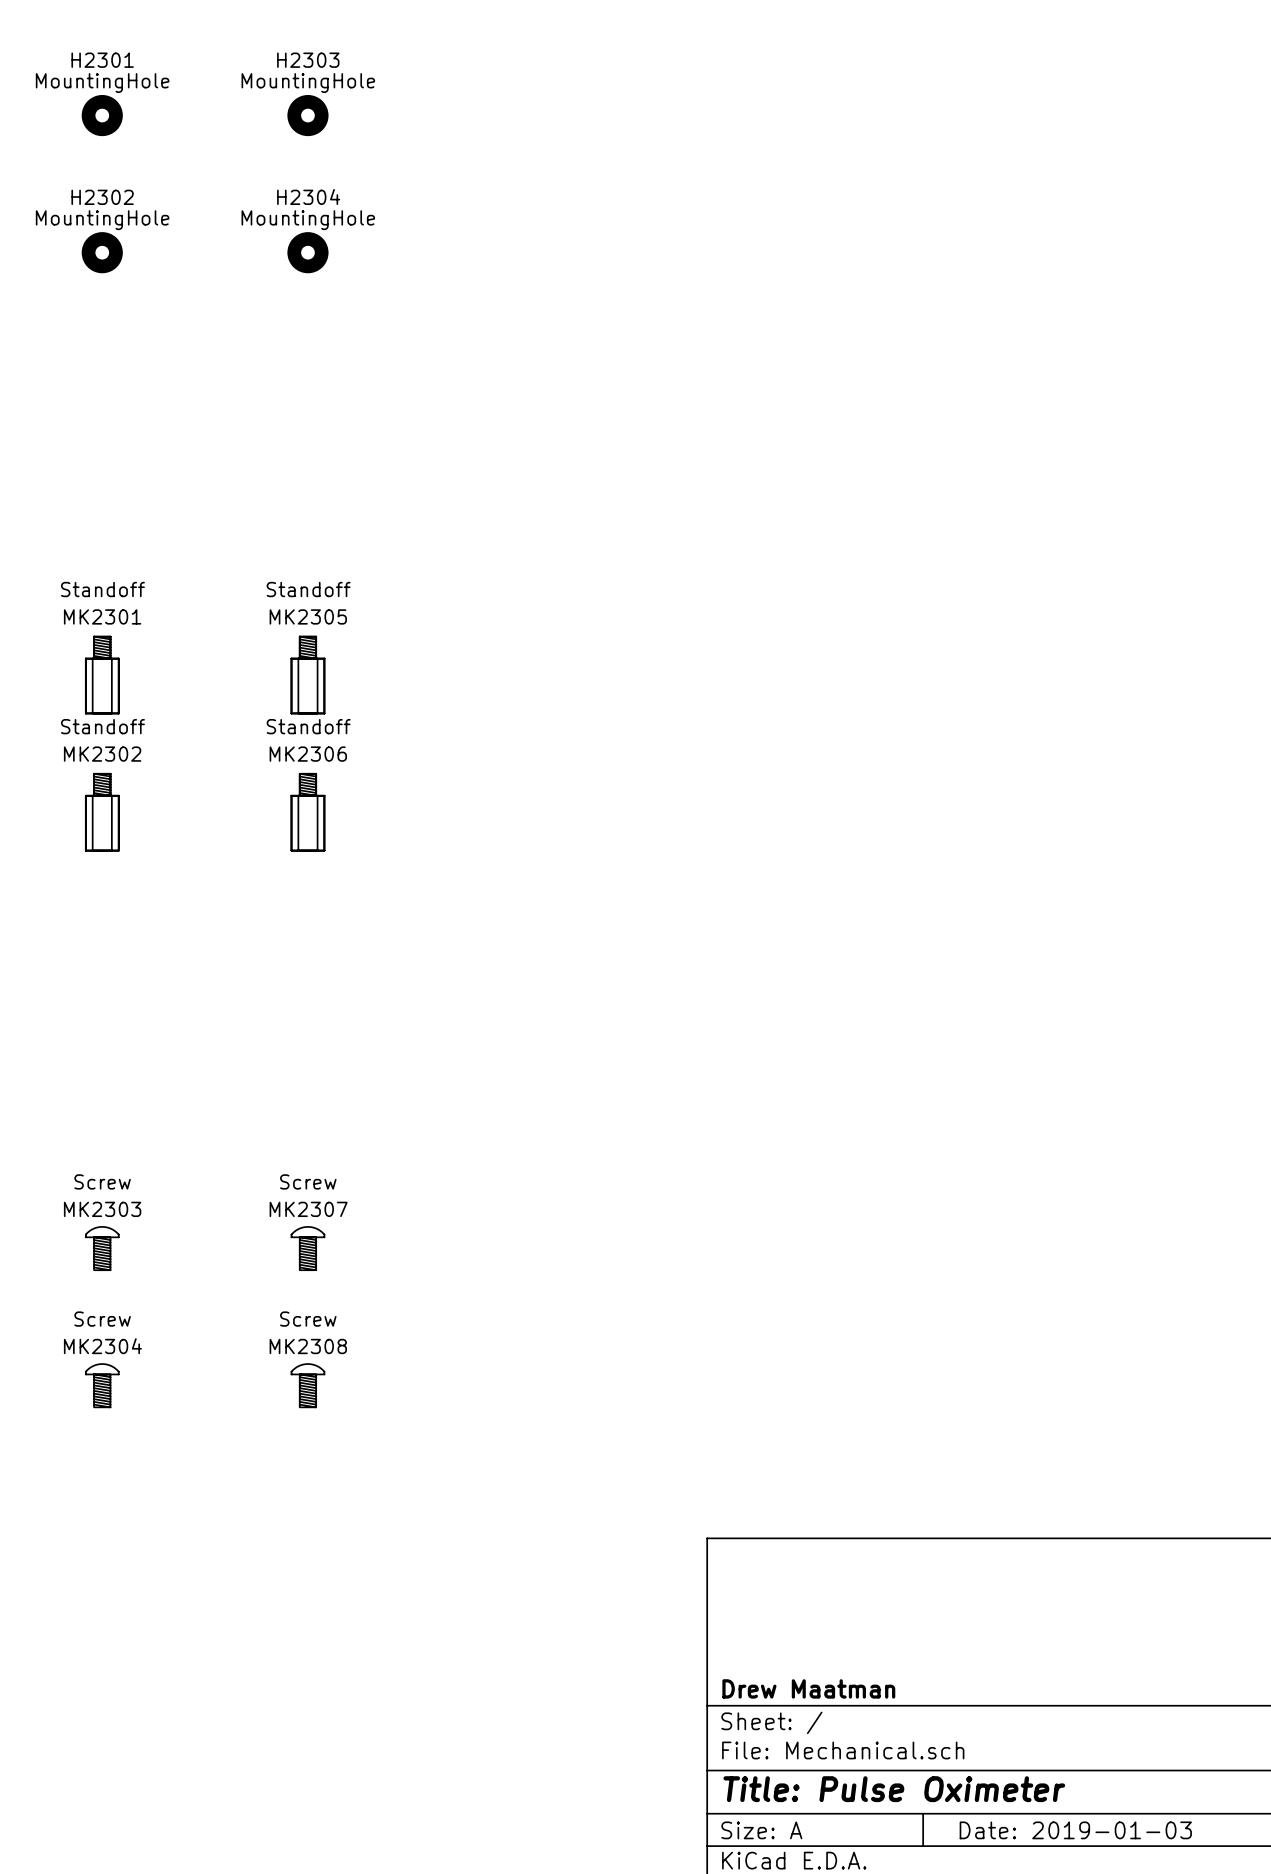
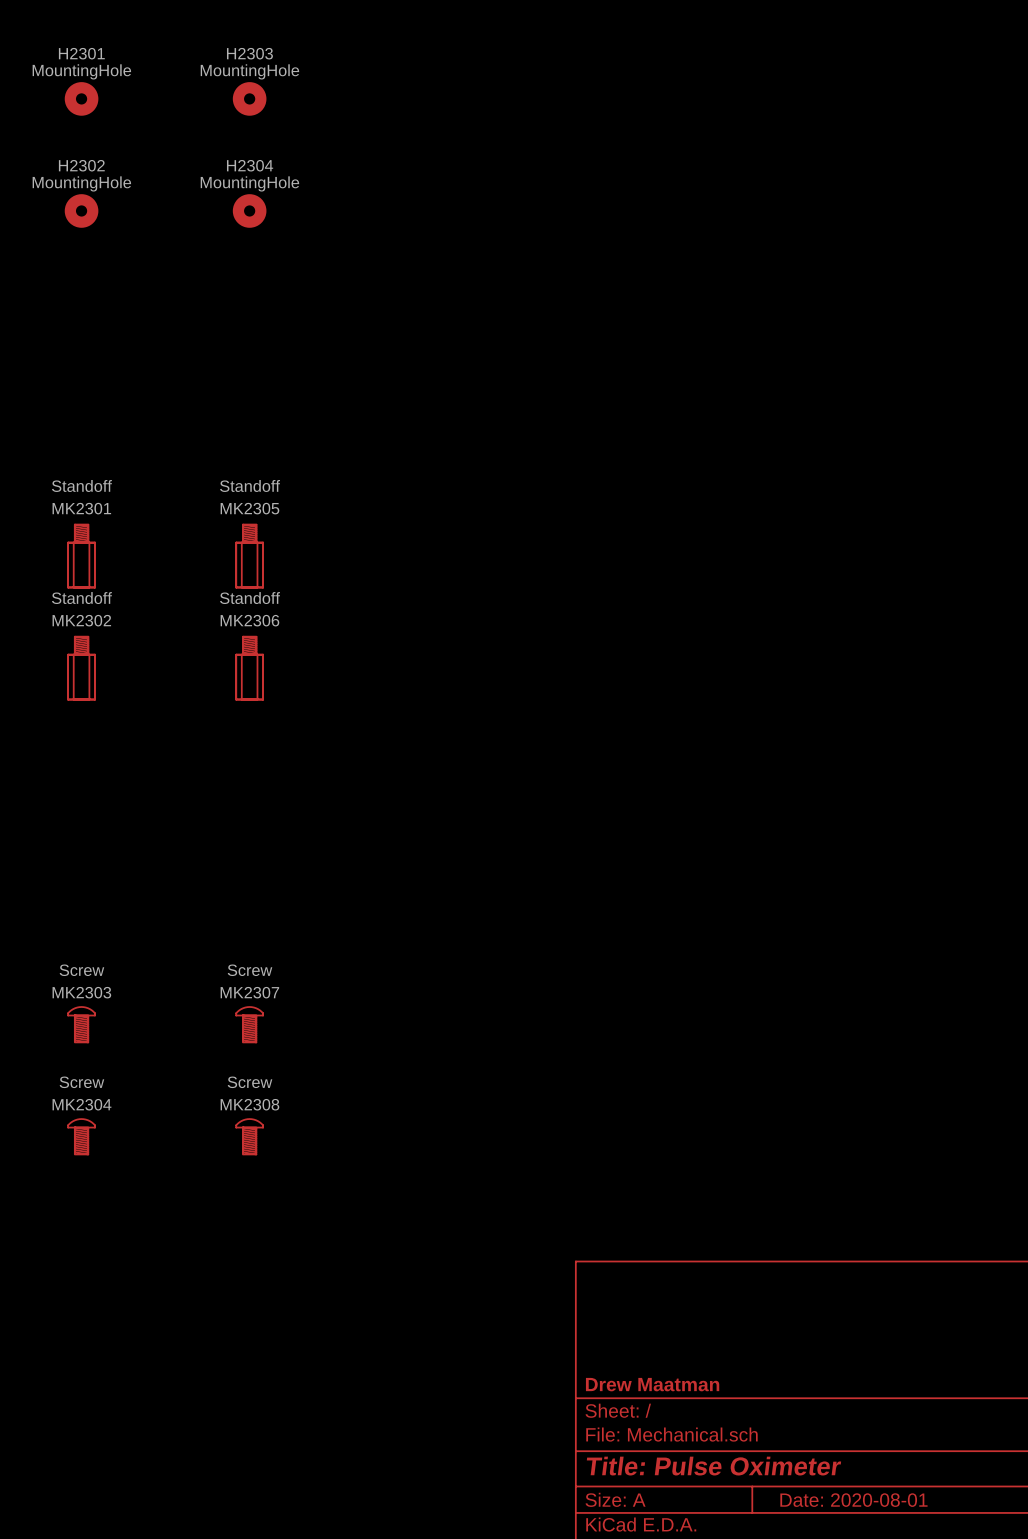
title block: Date: 2019-01-03 (1075, 1830) -> Date: 2020-08-01 (853, 1500)

